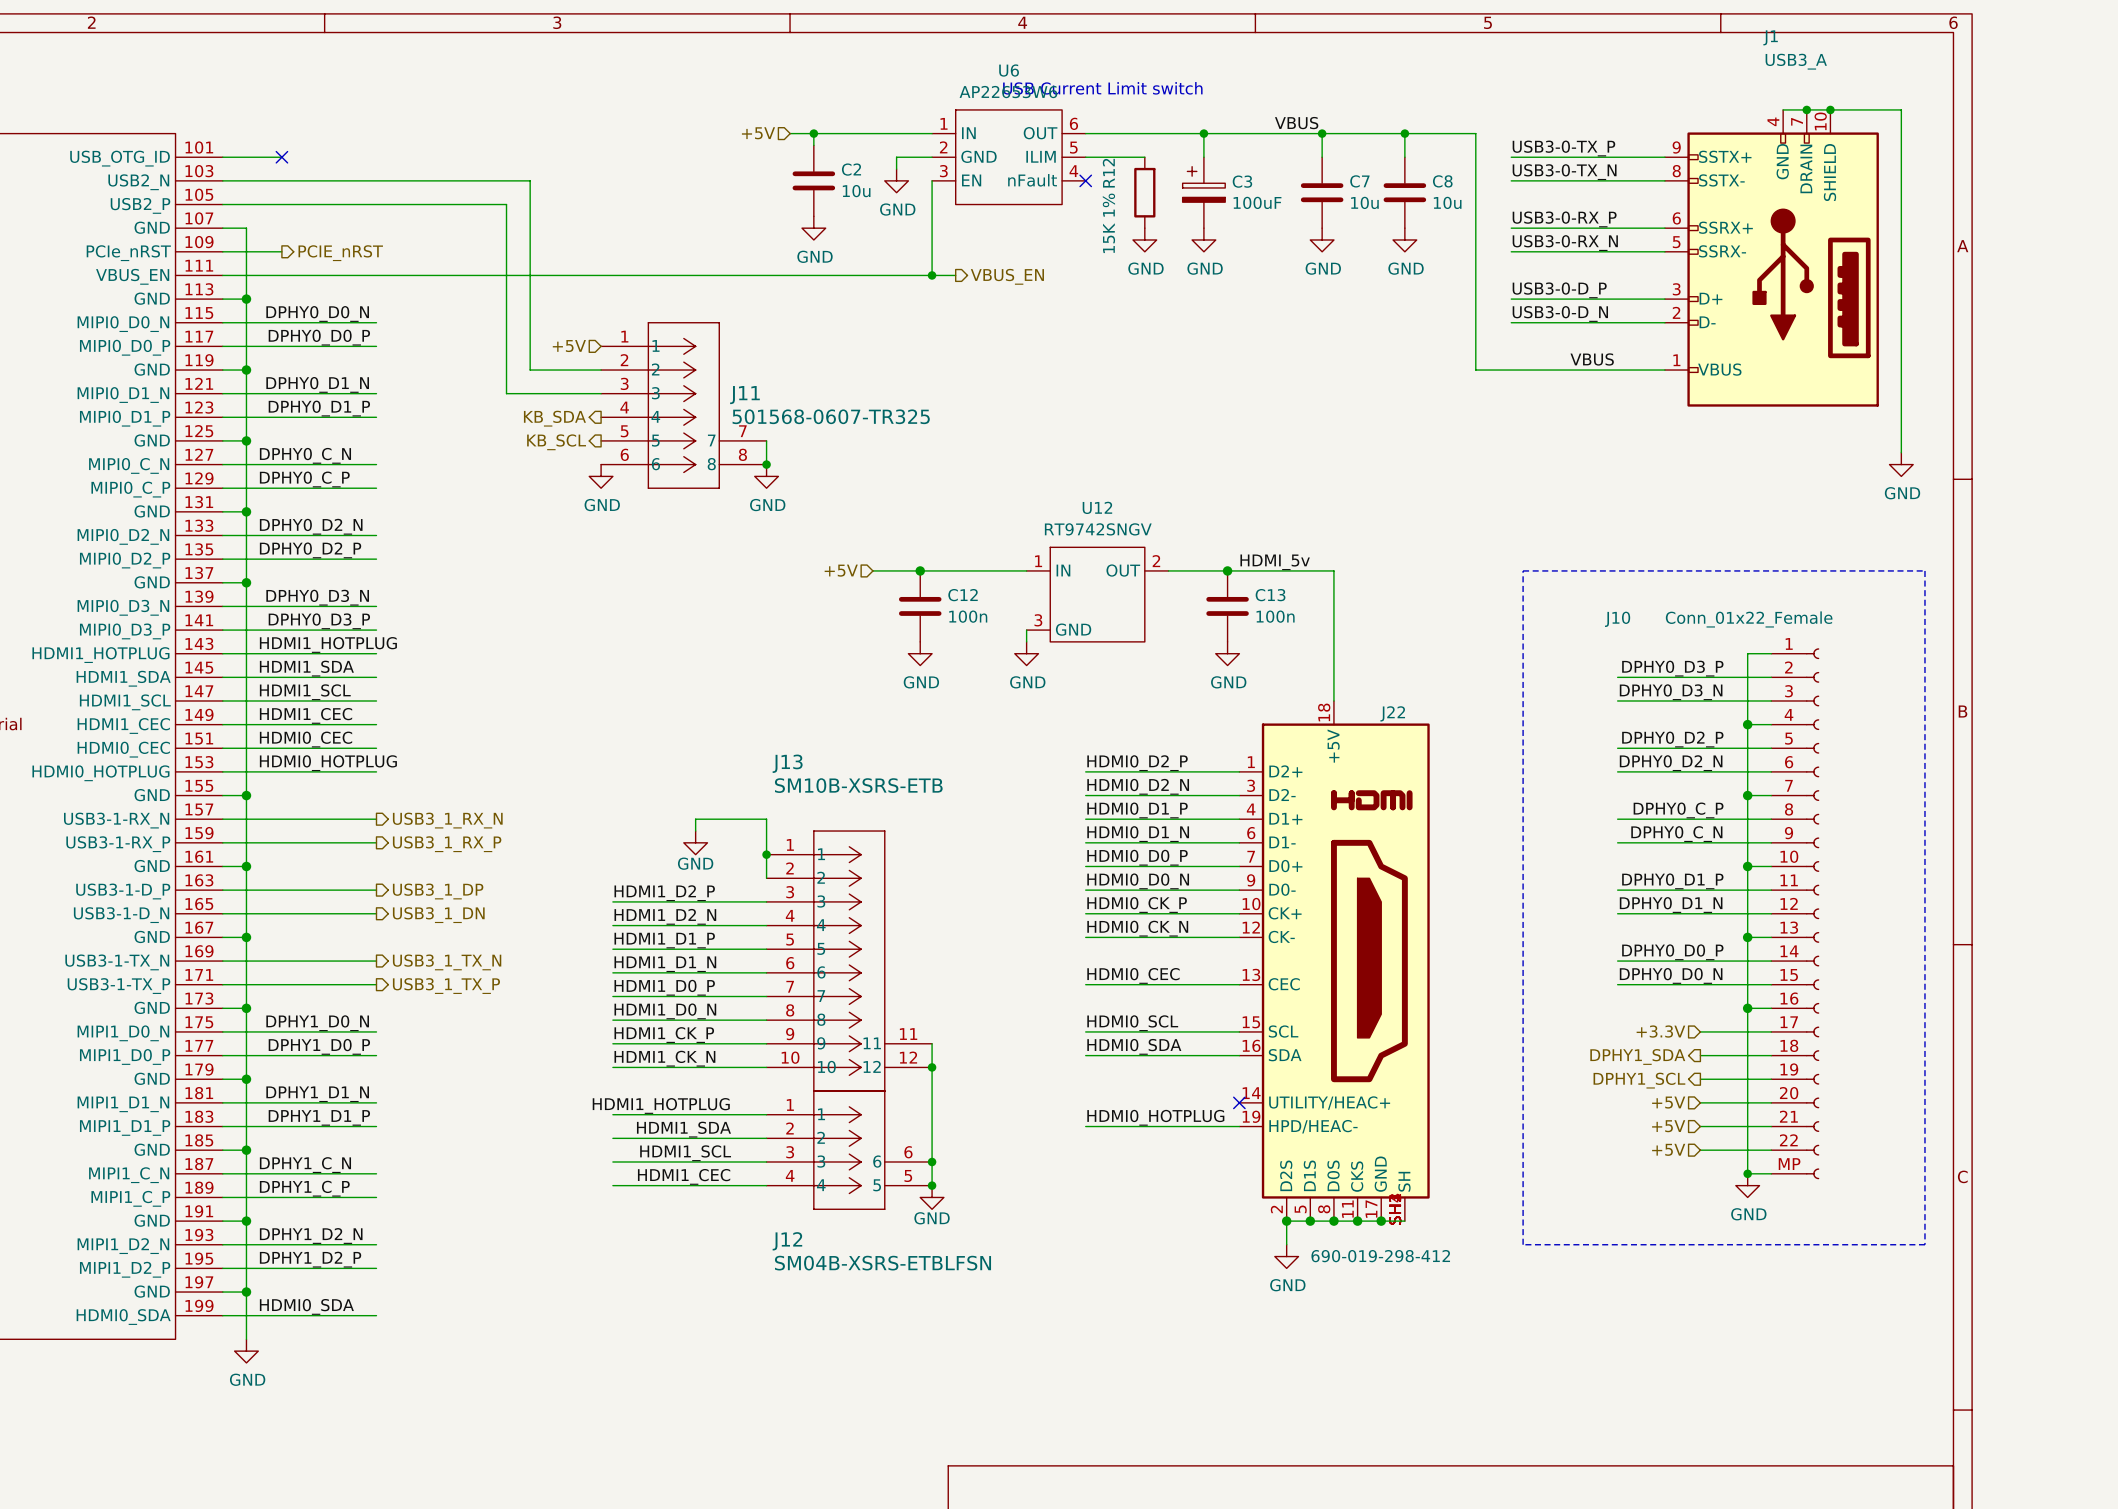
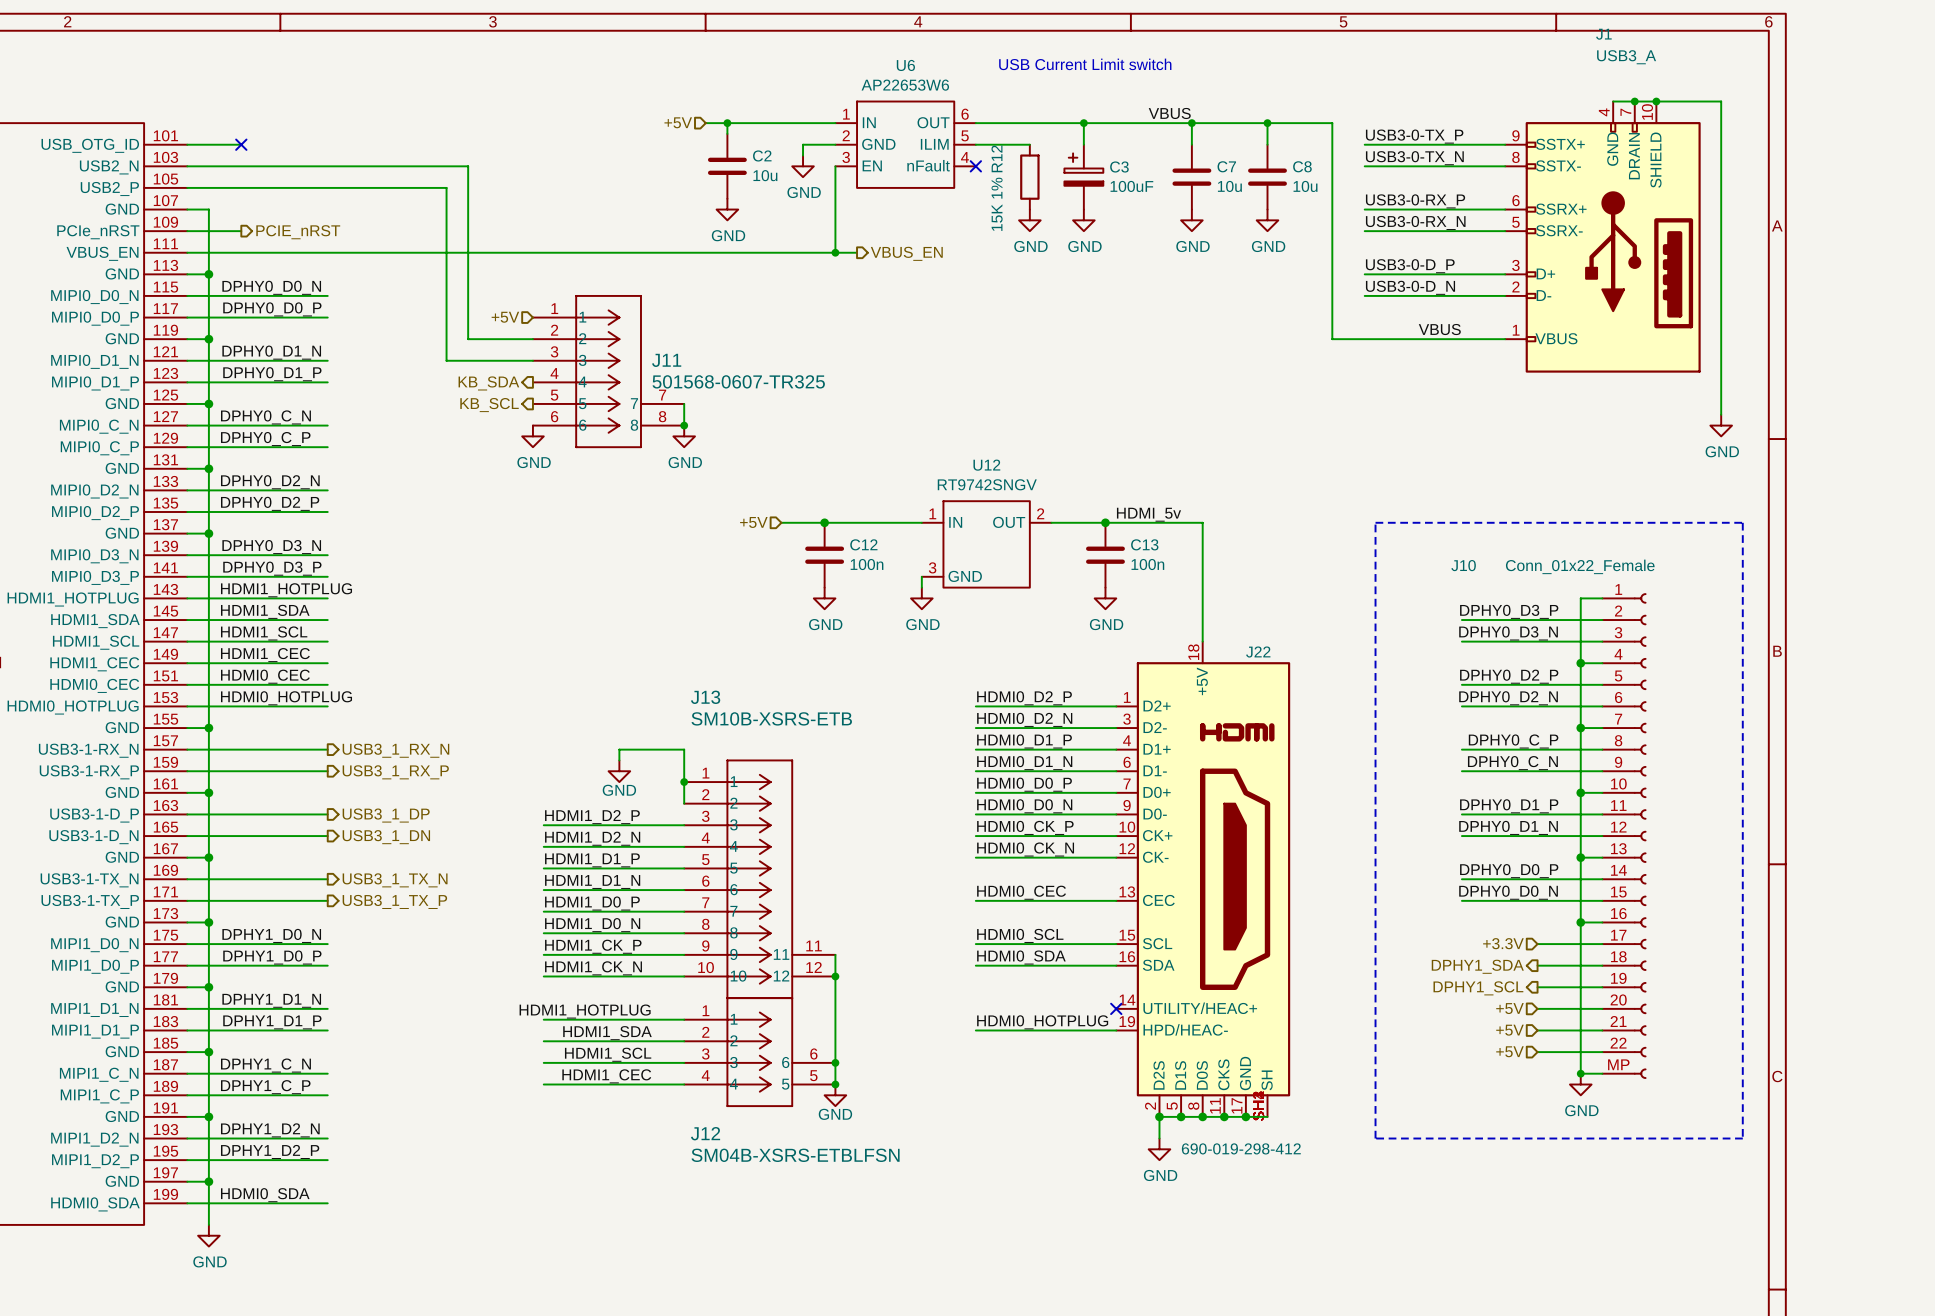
text position: USB Current Limit switch (1102, 88) -> USB Current Limit switch (1085, 64)

